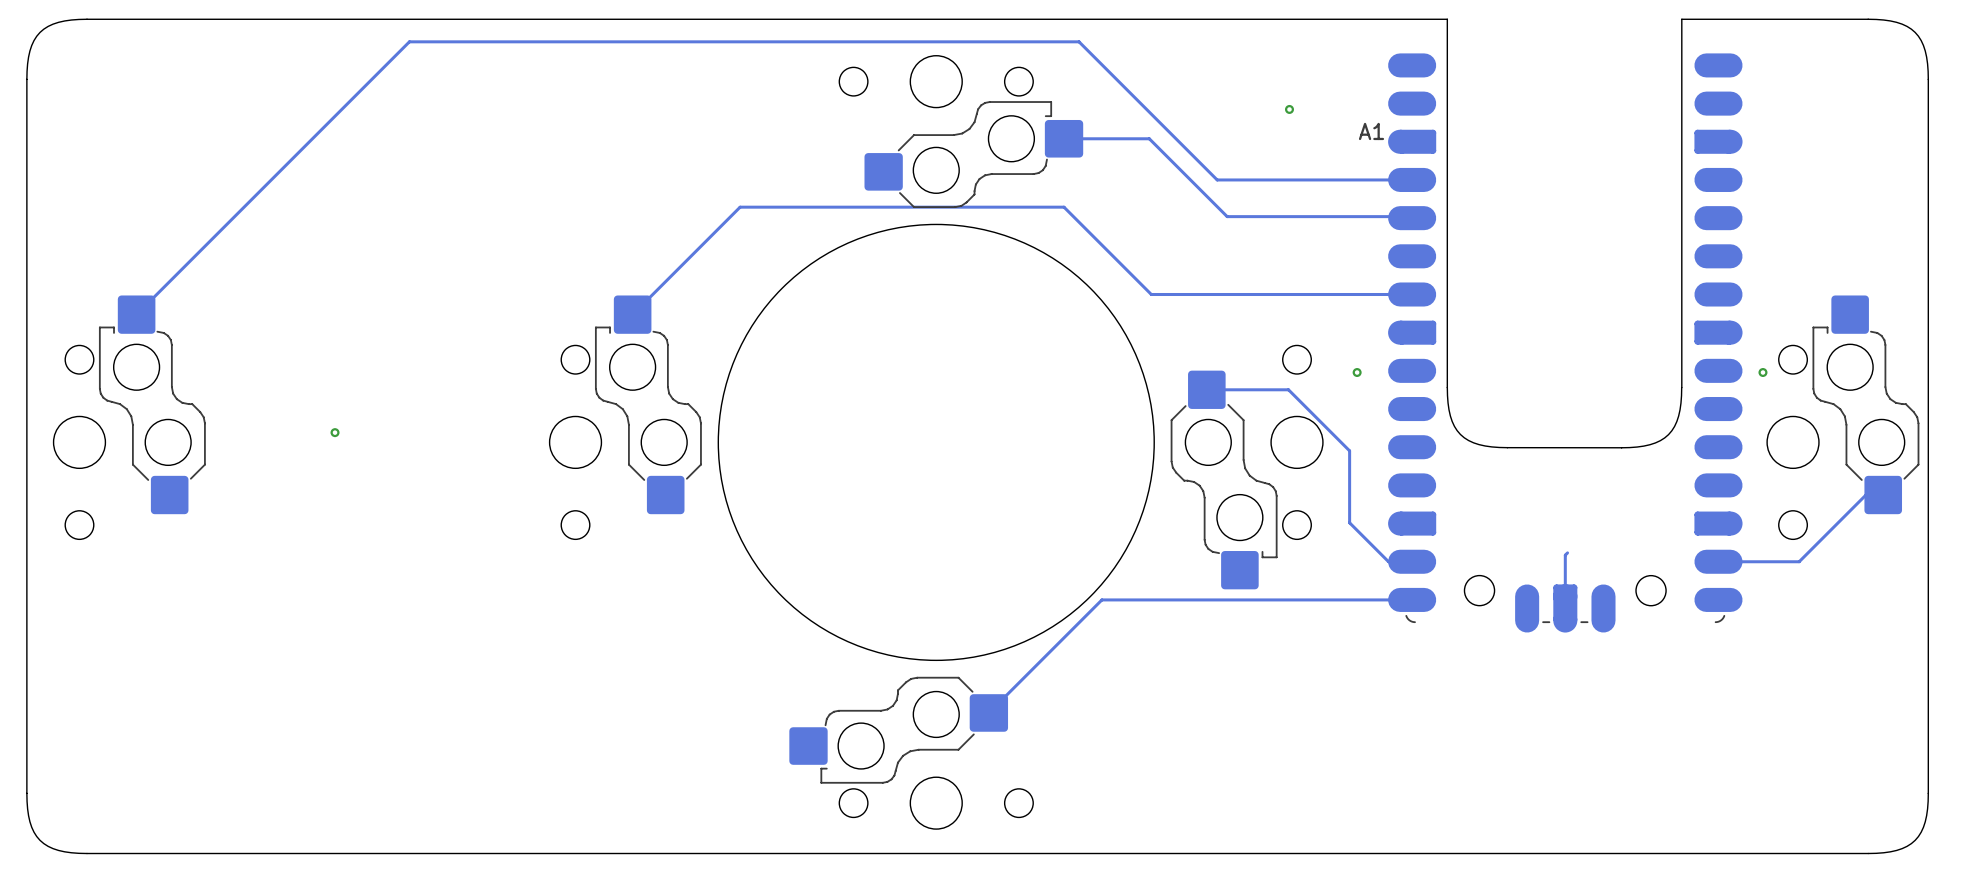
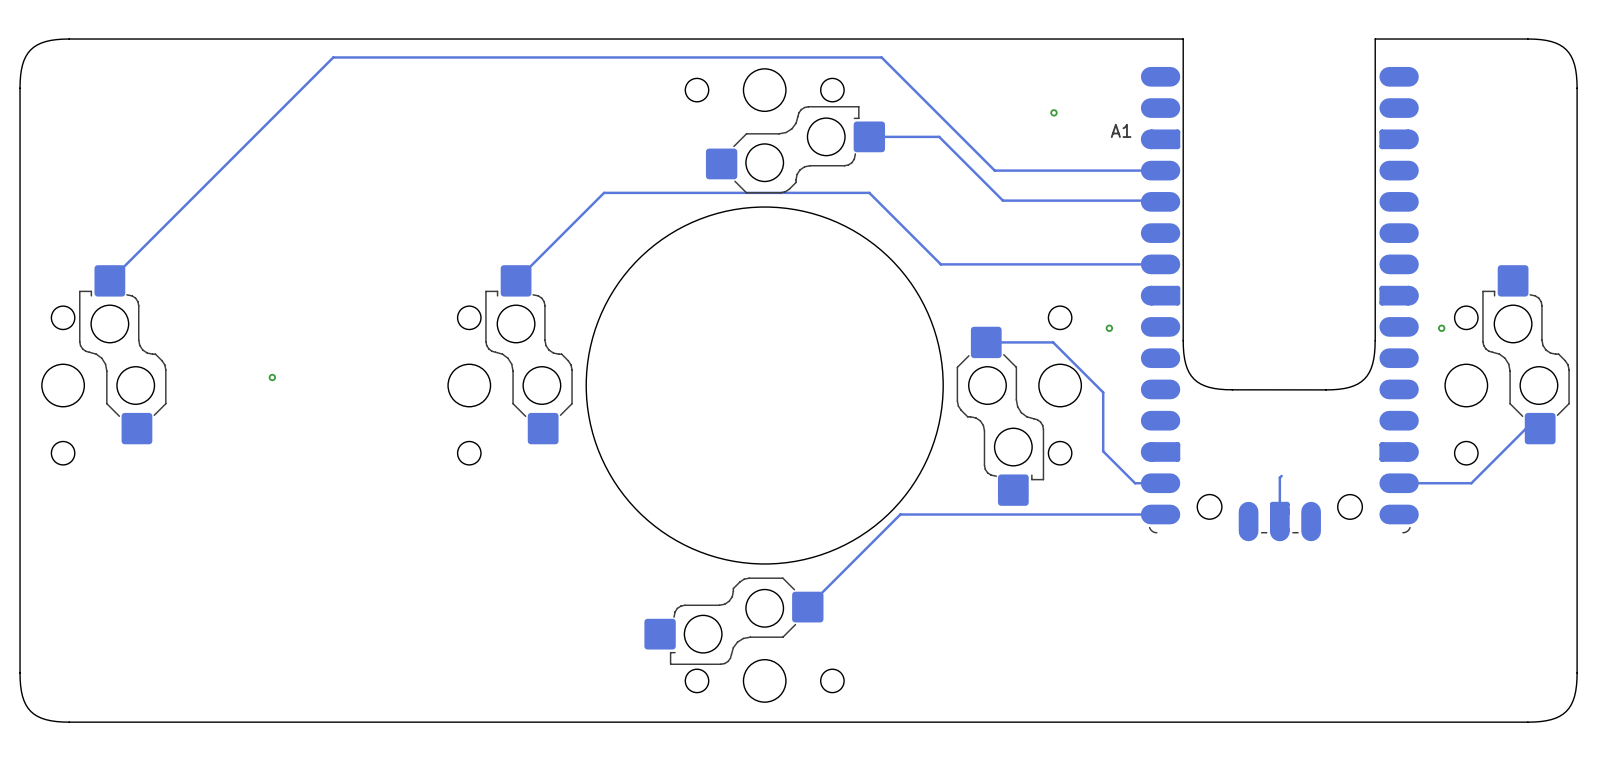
A1 footprint: [1388, 53, 1743, 633] -> [1140, 66, 1419, 542]

